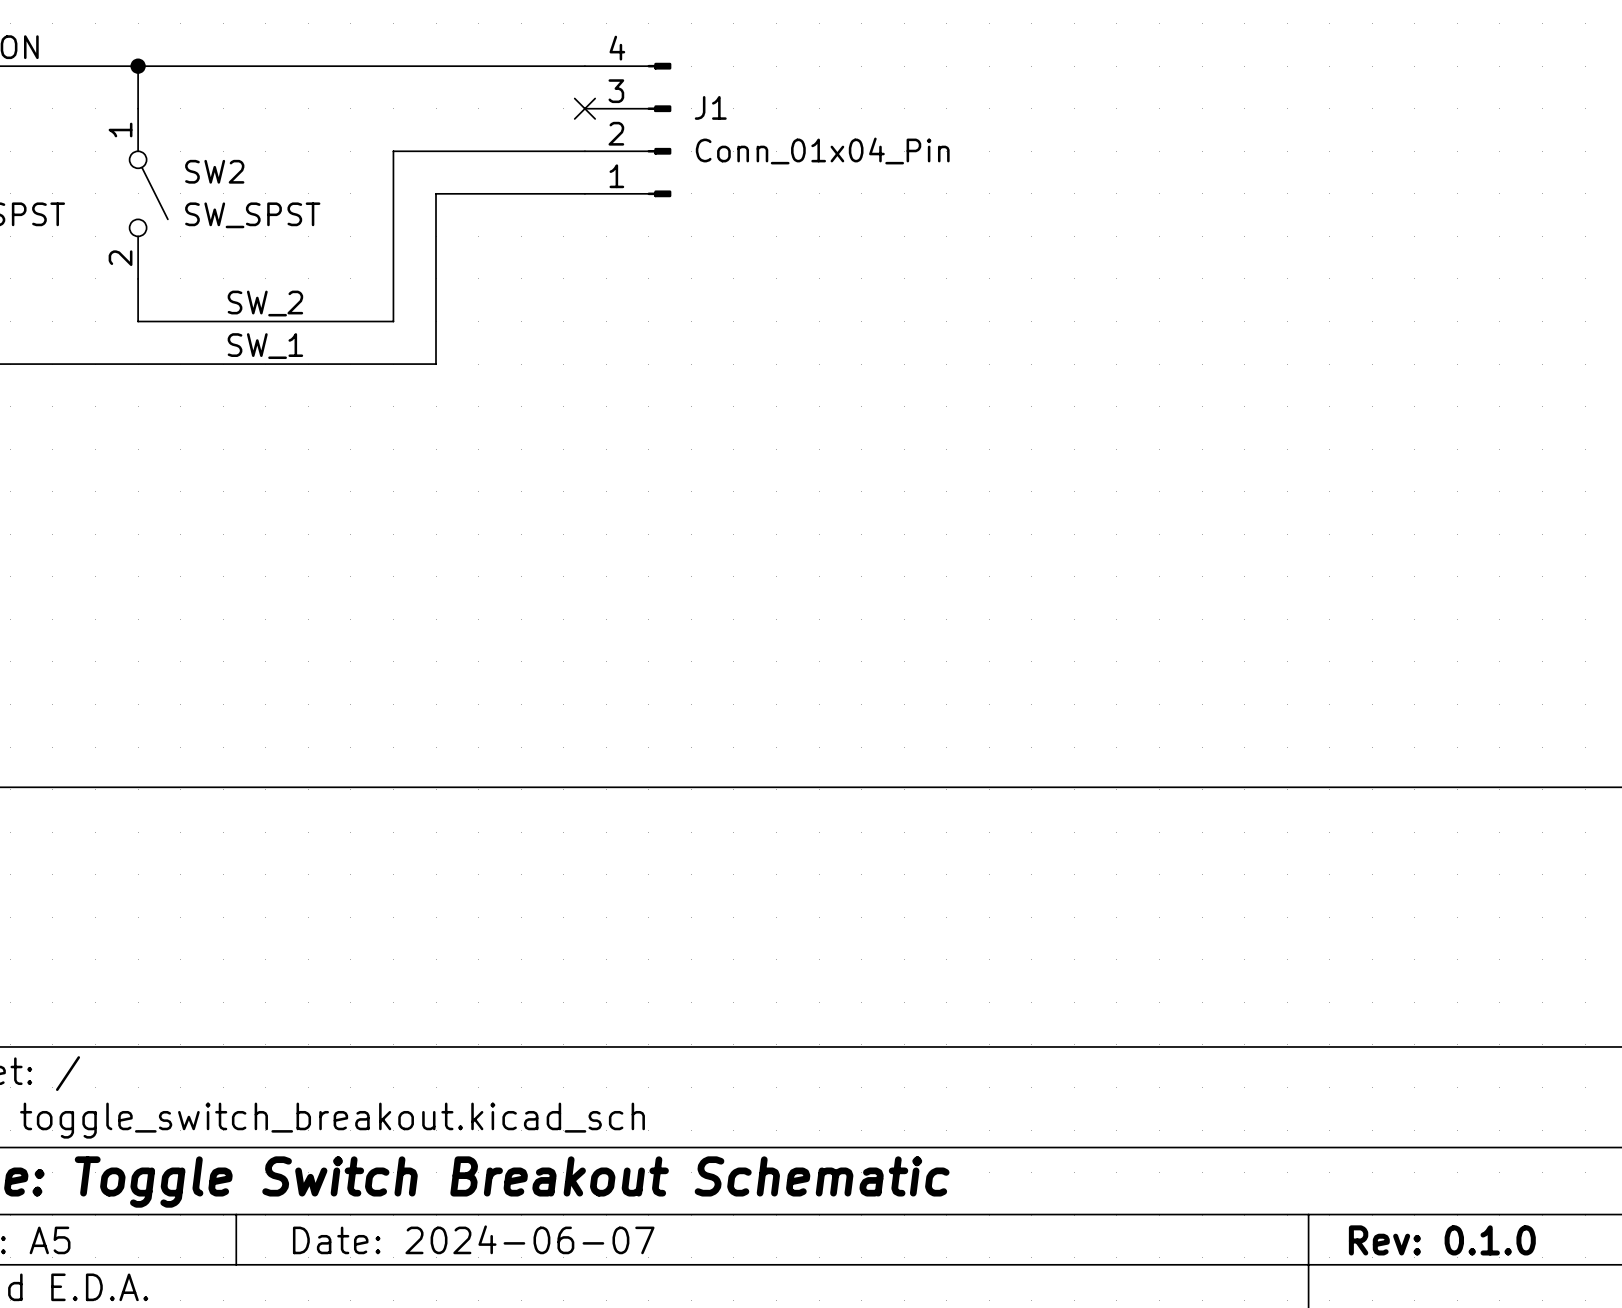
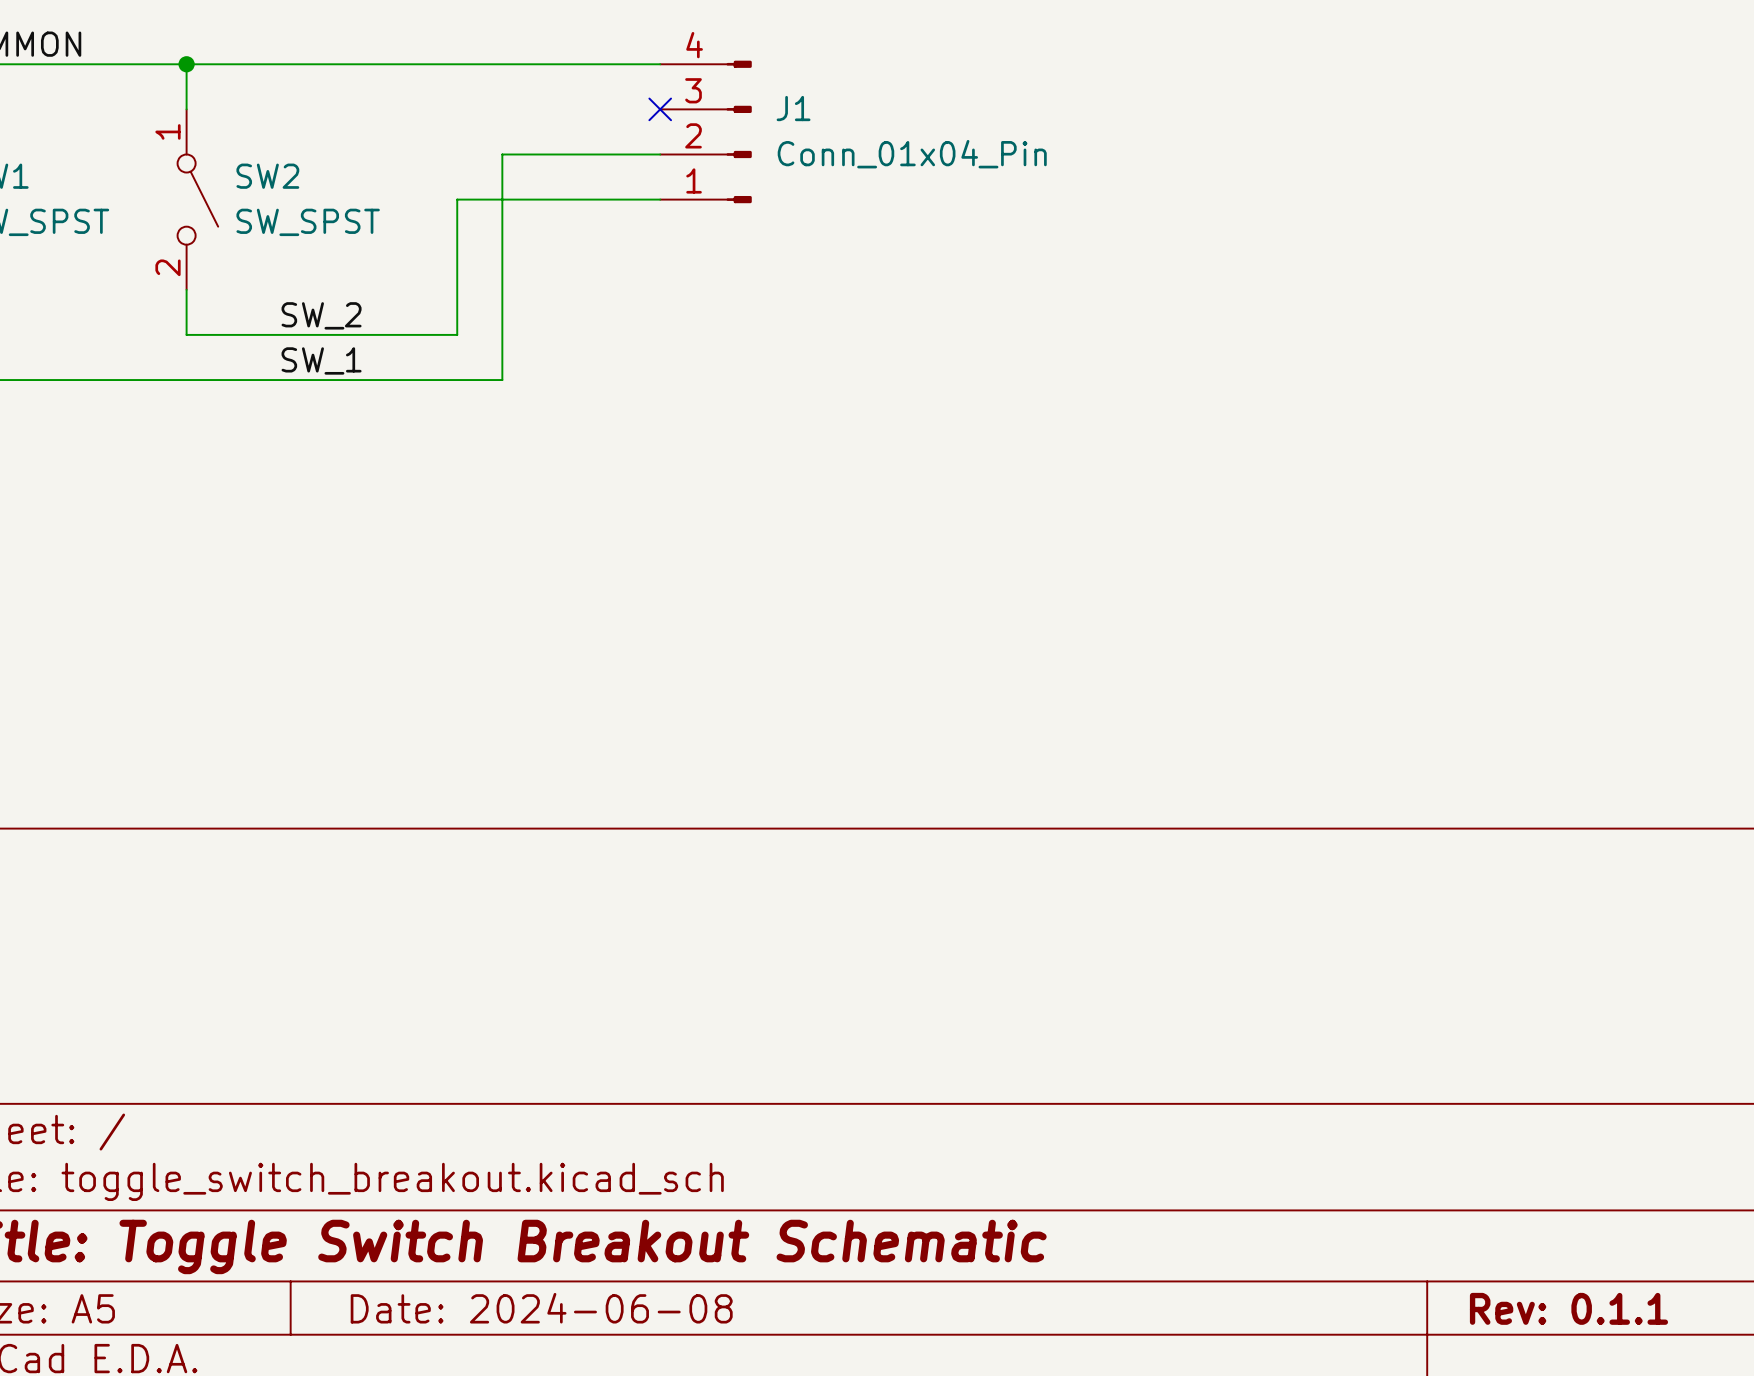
wire: (436, 151) (393, 151) (393, 193) -> (502, 154) (502, 199) (457, 199)
title block: Date: 2024-06-07 (473, 1239) -> Date: 2024-06-08 (541, 1308)
title block: Rev: 0.1.0 (1442, 1240) -> Rev: 0.1.1 (1568, 1308)

